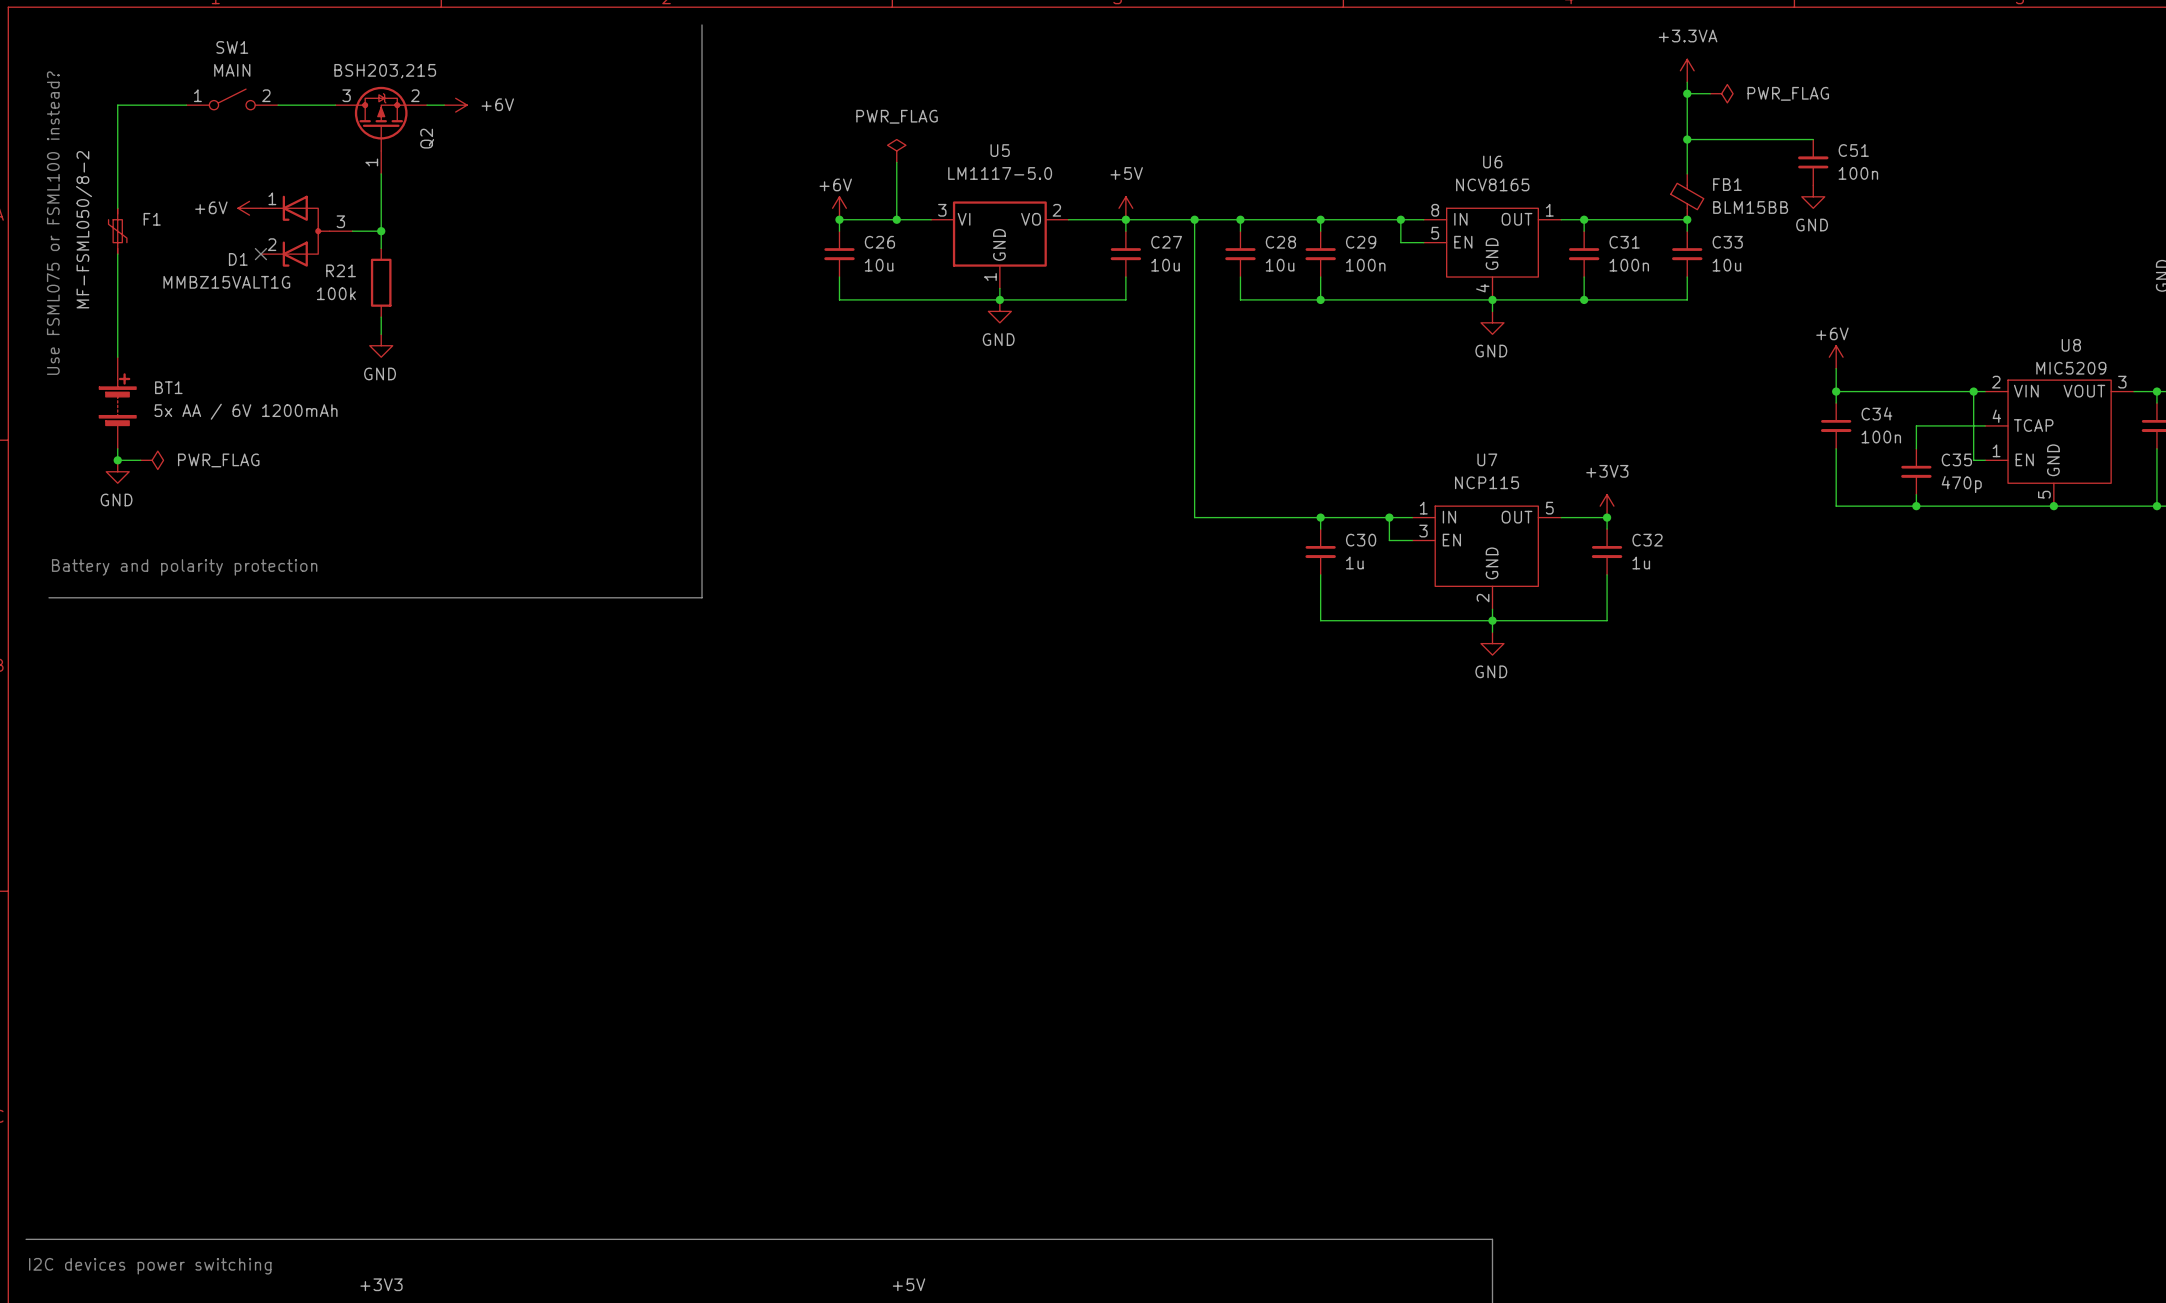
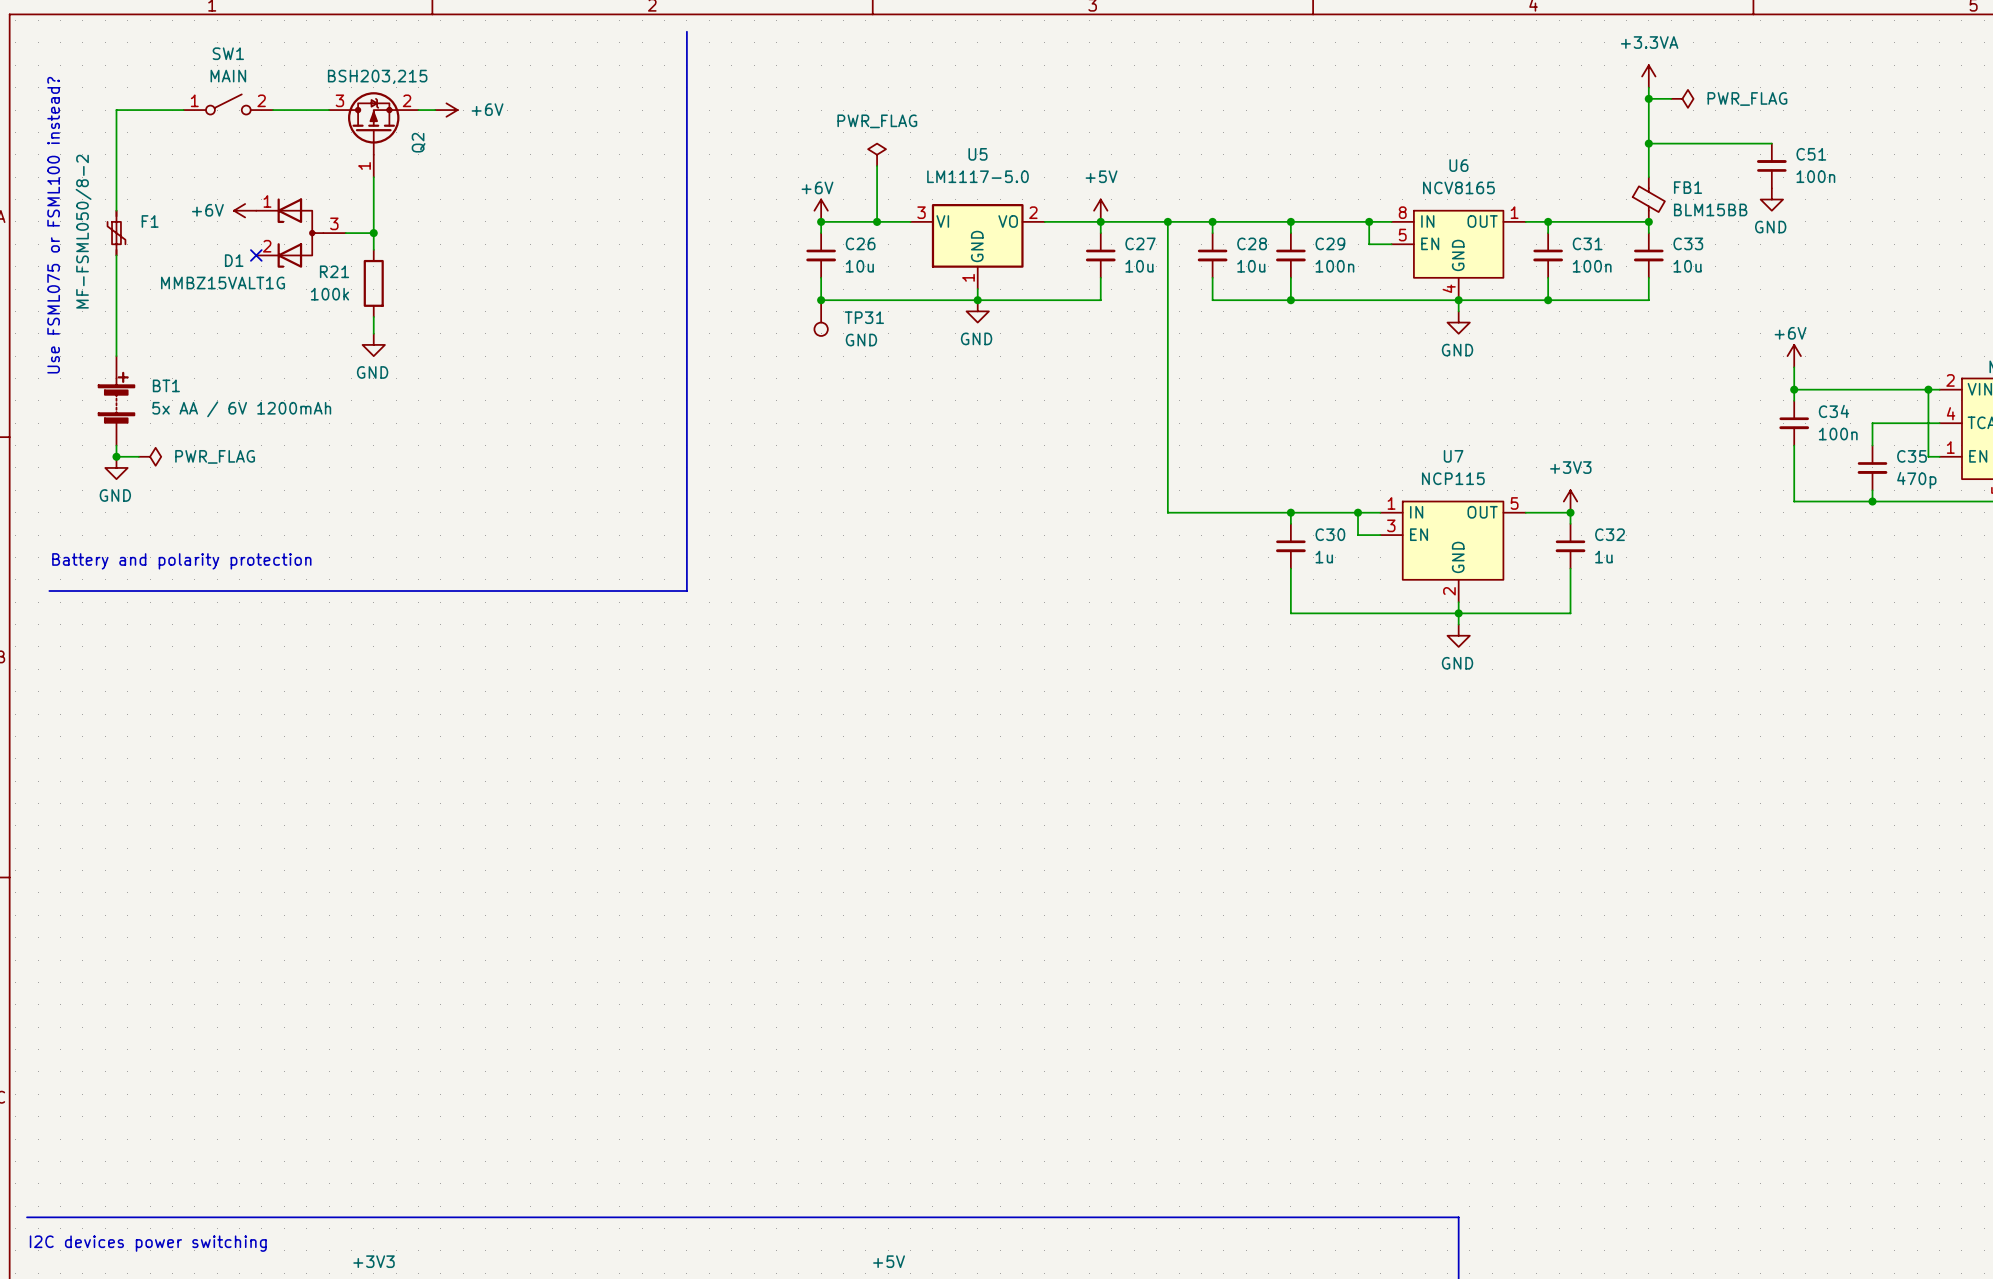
junction: none -> (821, 300)
TP31: none -> GND (821, 318)

